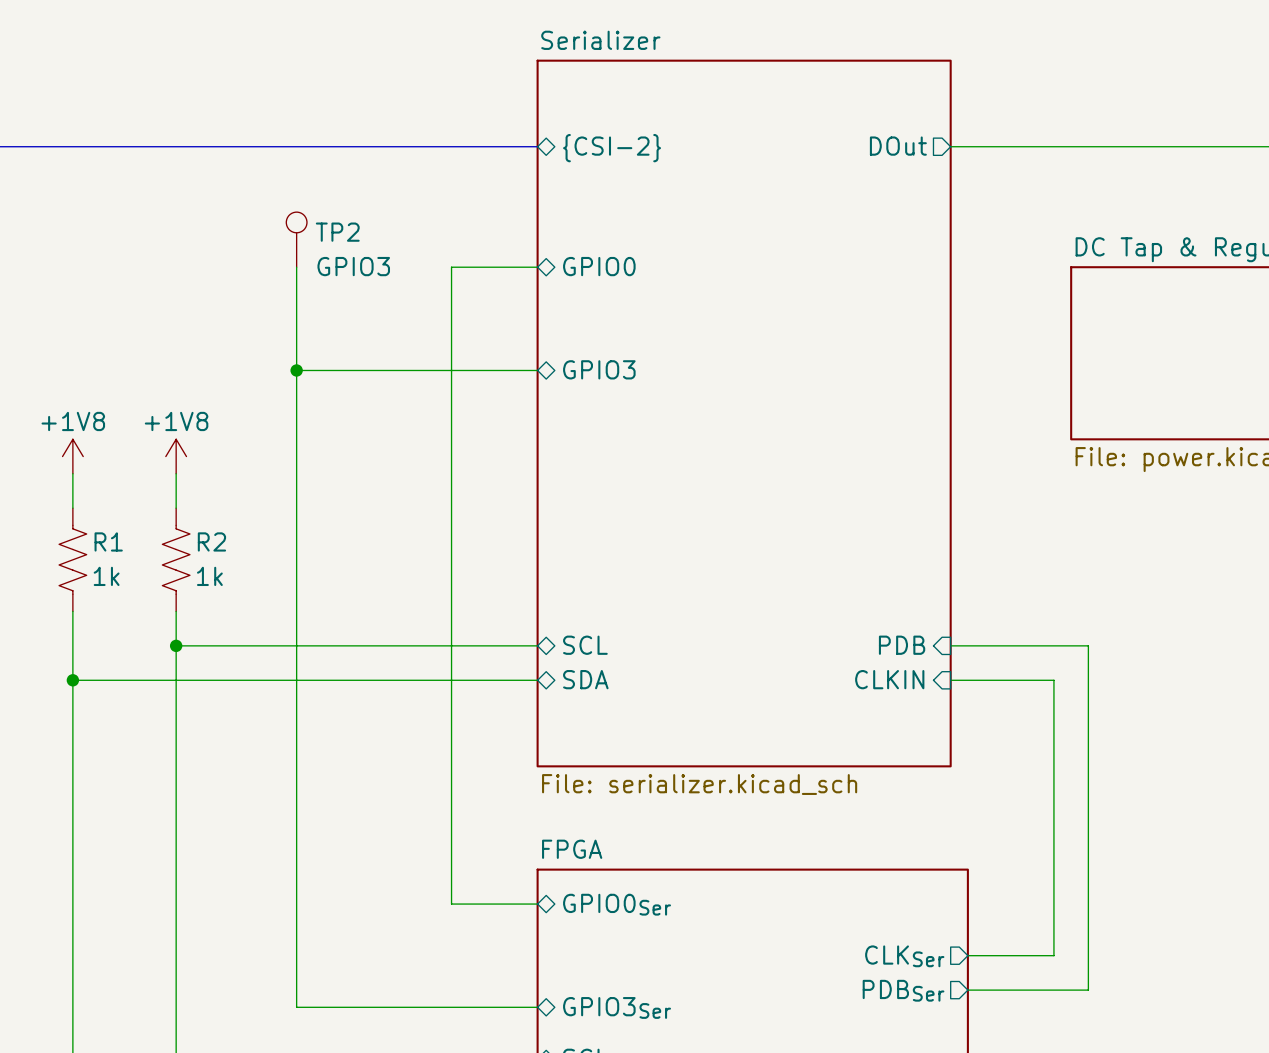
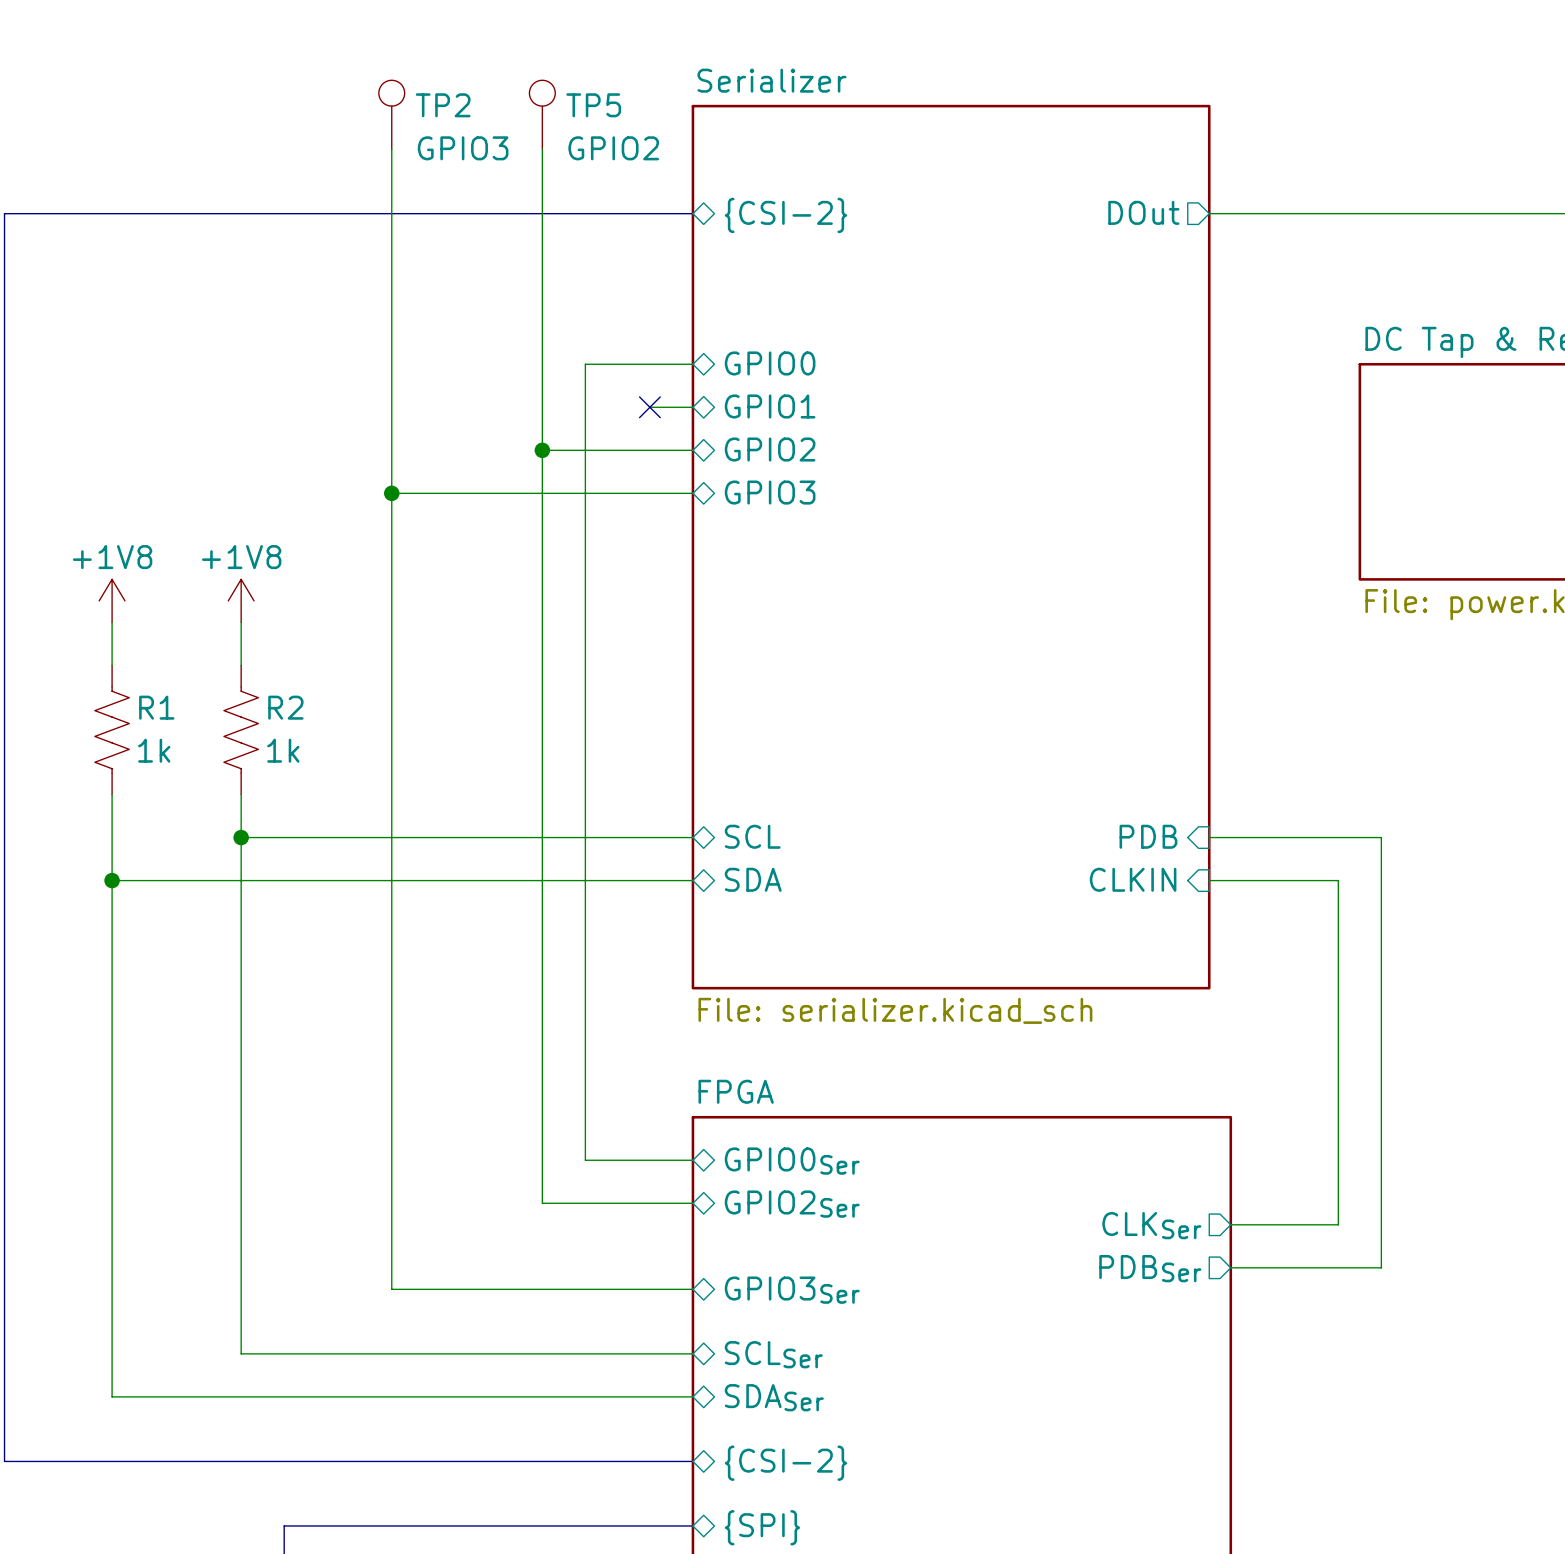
TP5: none -> GPIO2 (542, 114)
wire: none -> (391, 149) (391, 364)
wire: none -> (542, 149) (542, 1203) (692, 1203)
TP2 position: (296, 239) -> (391, 114)
sheet pin: none -> GPIO1 (770, 406)
wire: none -> (649, 407) (692, 407)
no-connect mark: none -> (649, 407)
sheet pin: none -> GPIO2 (770, 449)
wire: none -> (542, 450) (692, 450)
junction: none -> (542, 450)
sheet pin: none -> GPIO2Ser (792, 1204)

